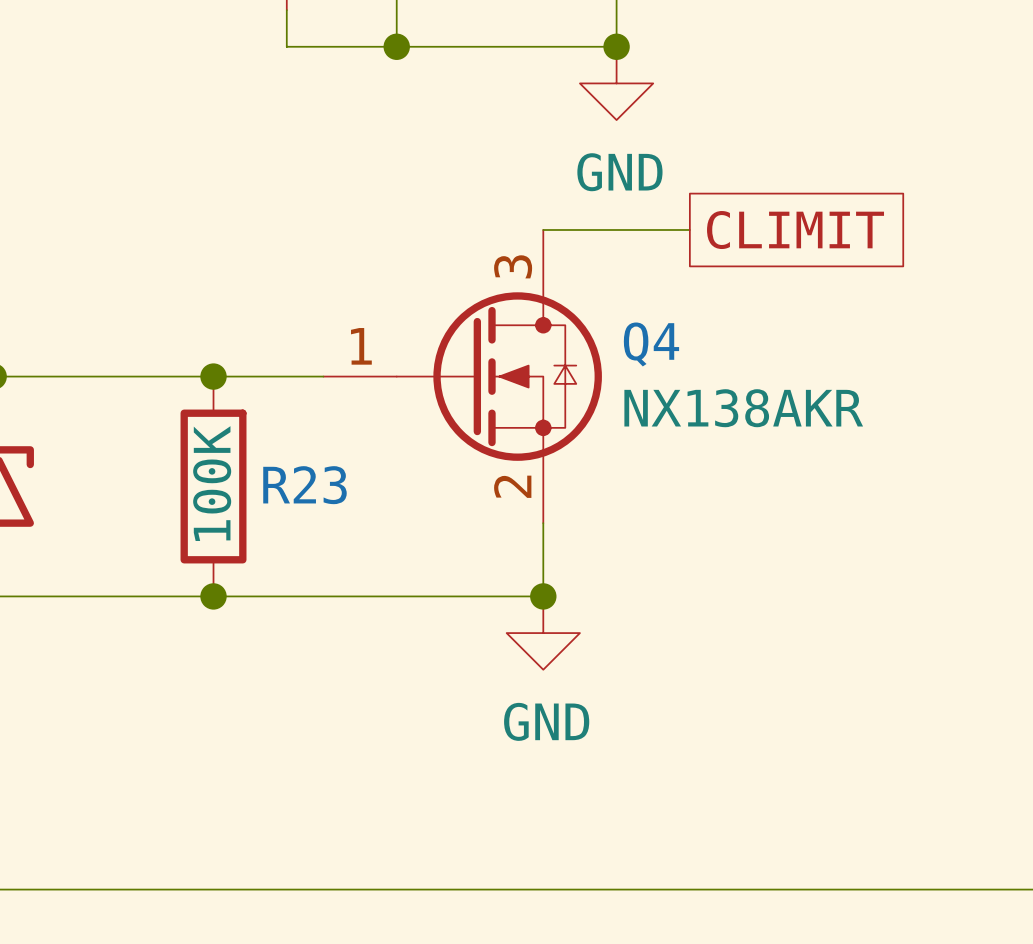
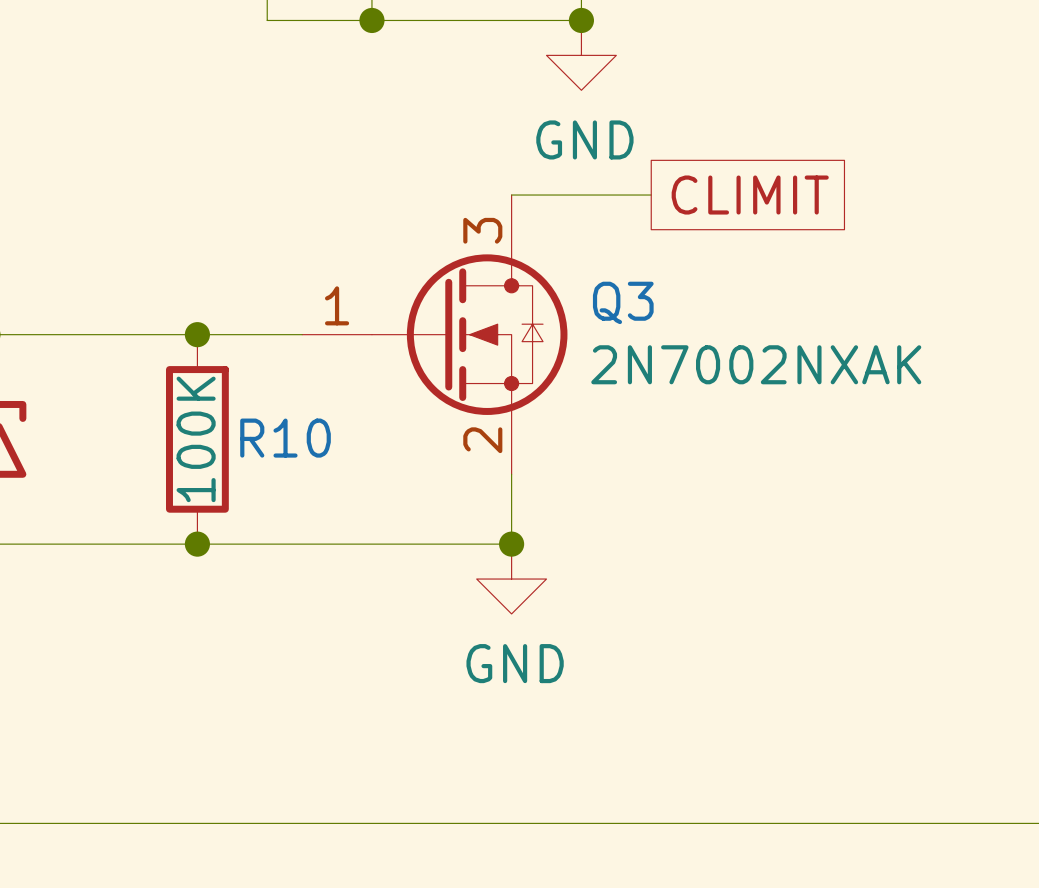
Q4 name: Q4 (651, 344) -> Q3 (623, 302)
Q4 value: NX138AKR (743, 408) -> 2N7002NXAK (756, 364)
R23 name: R23 (304, 485) -> R10 (285, 438)

